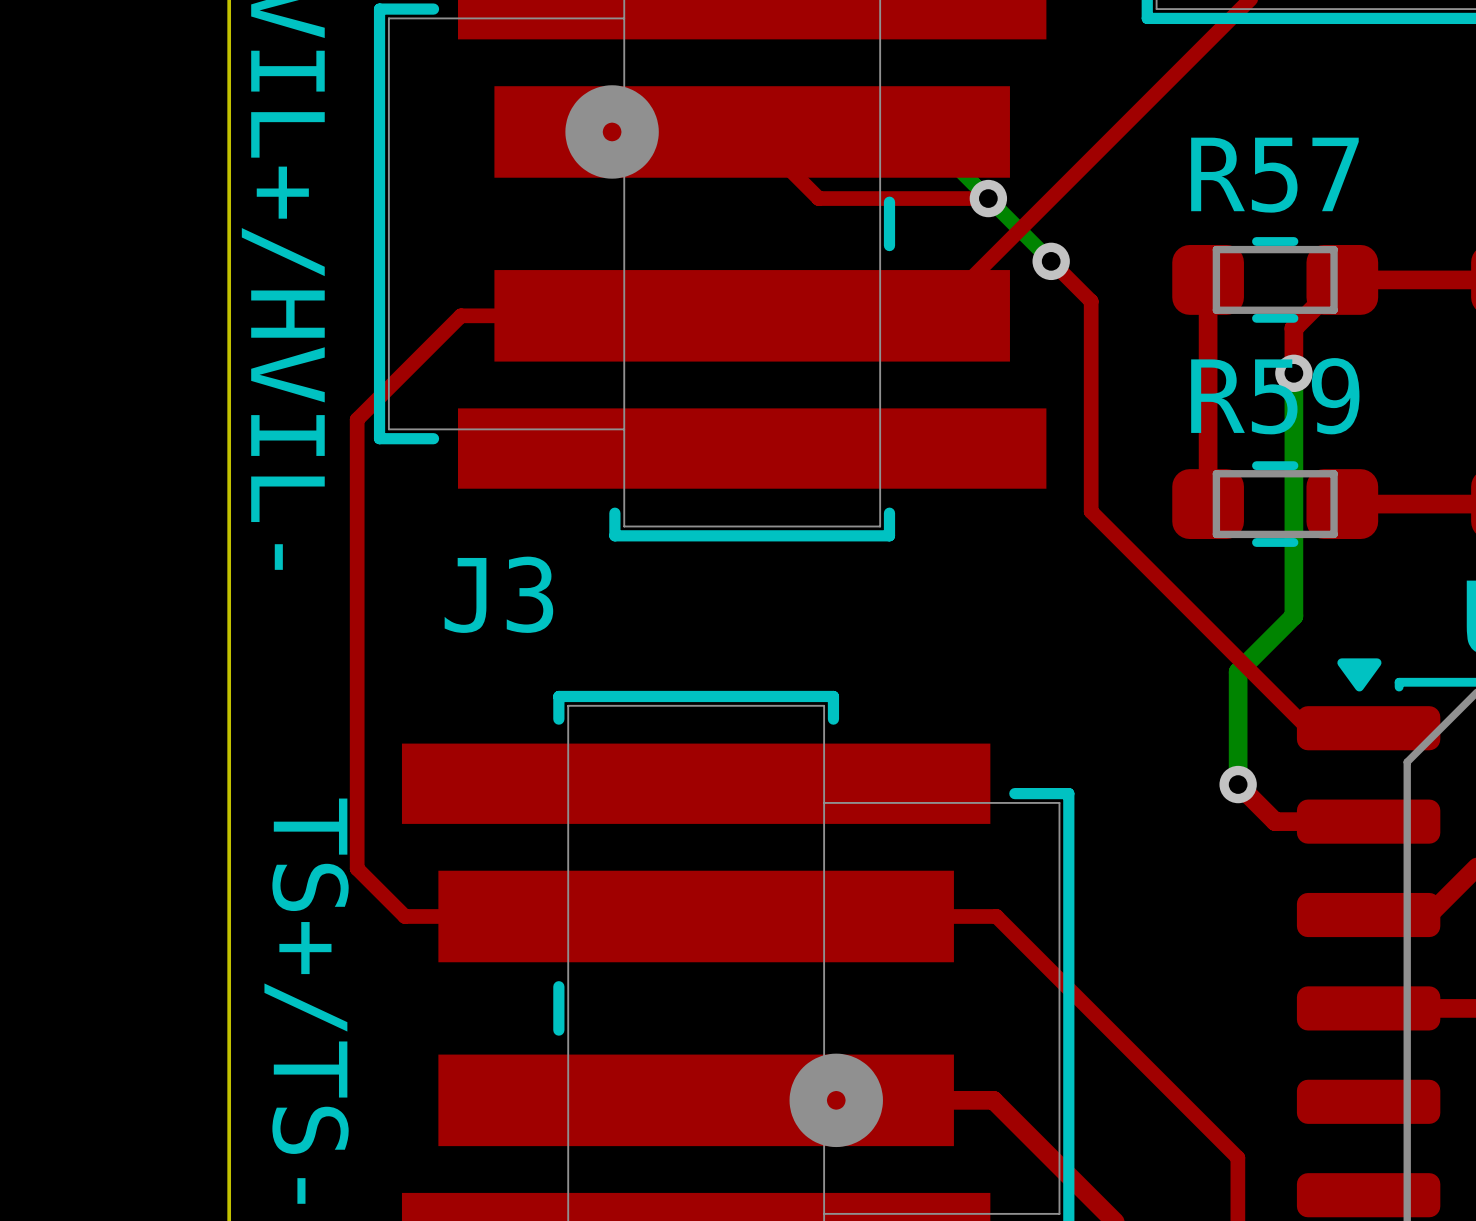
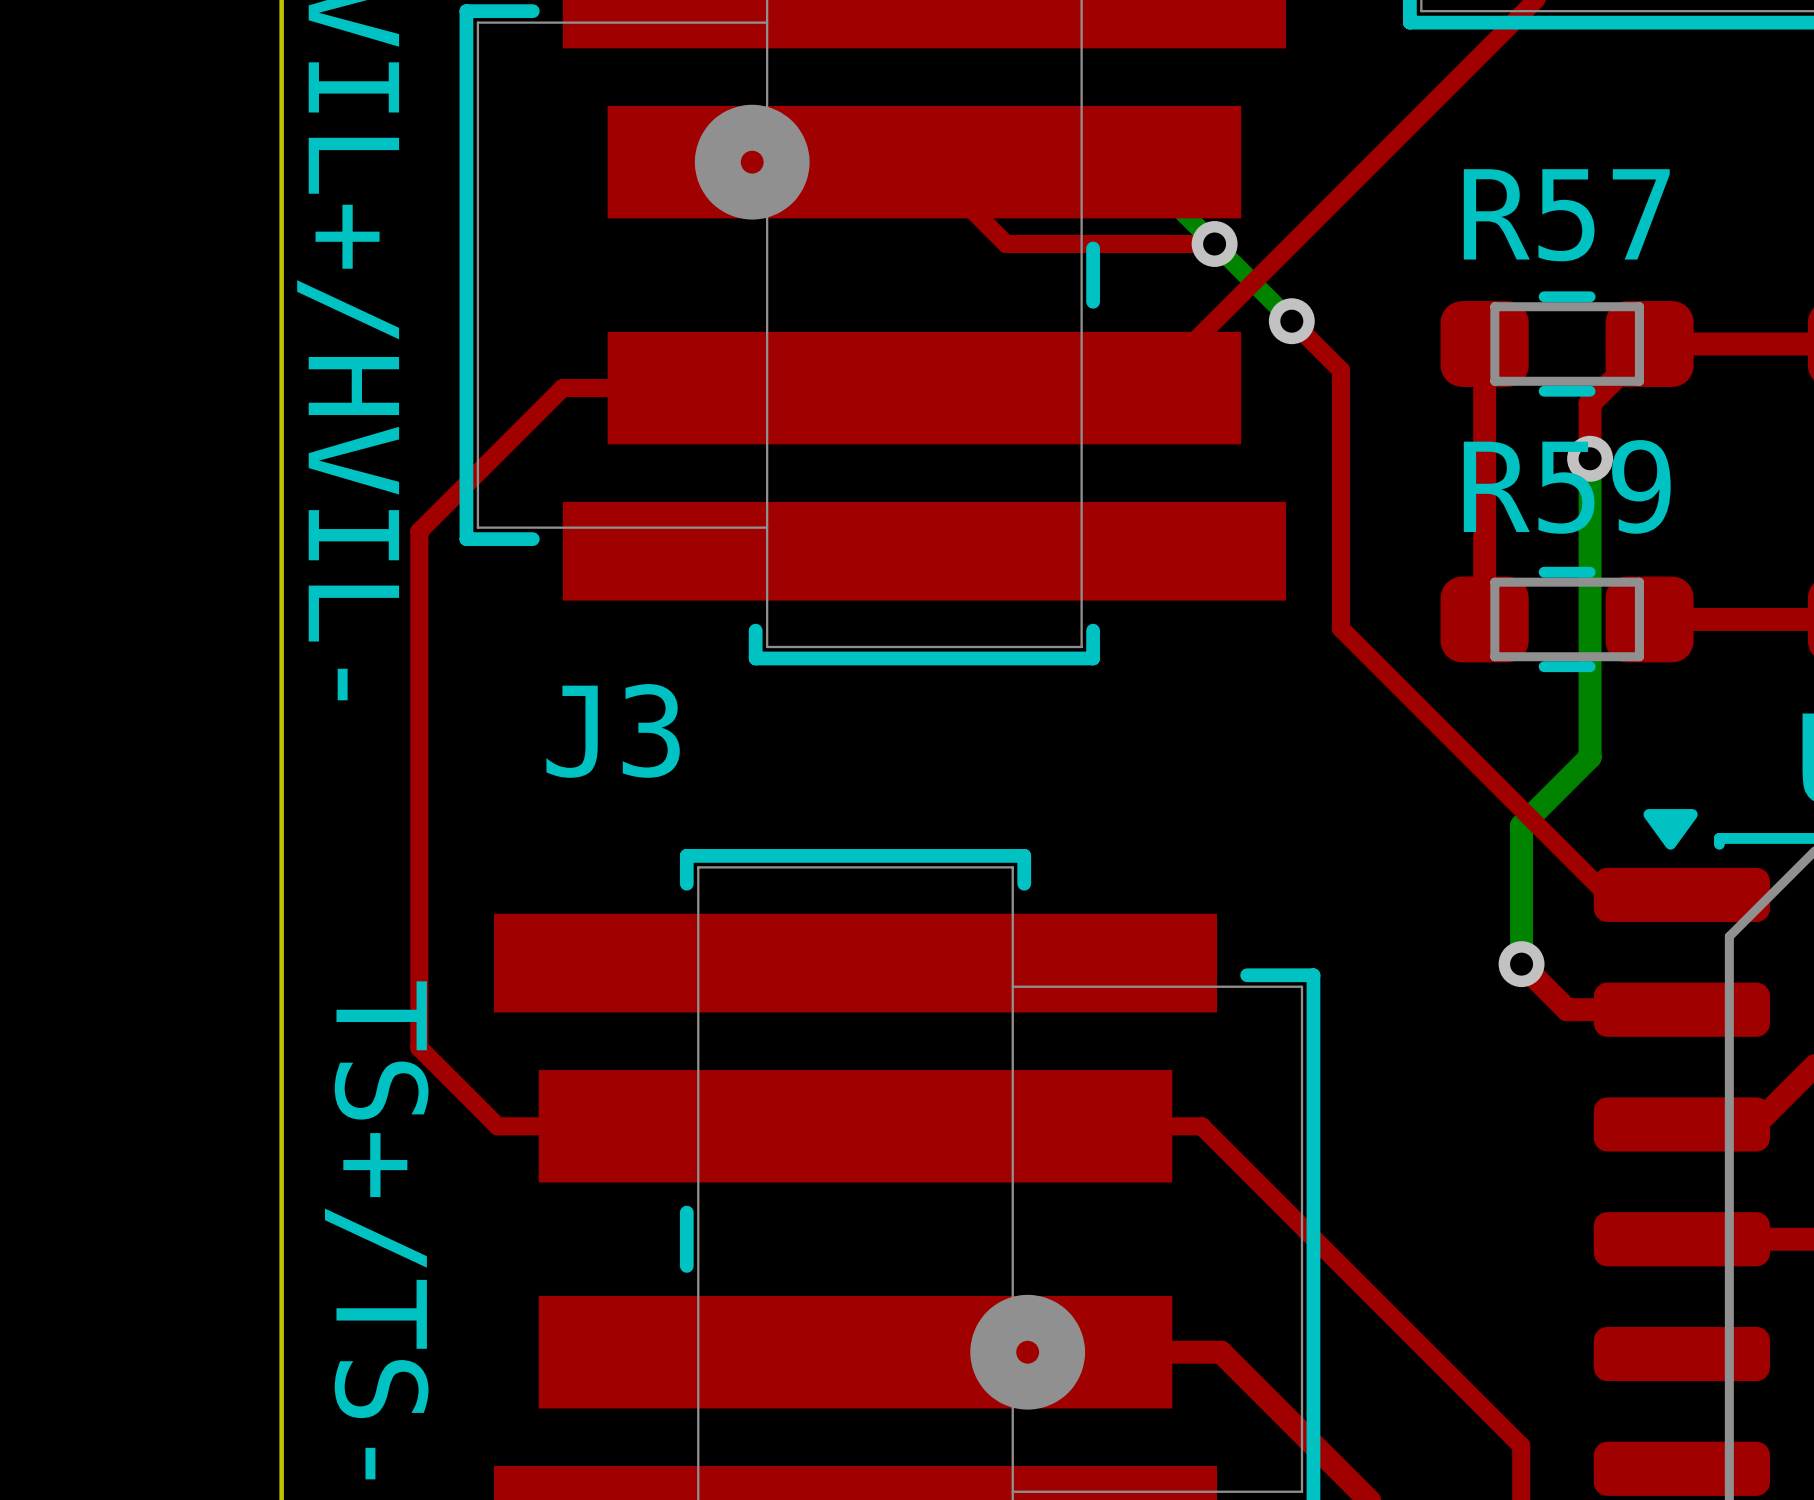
top track: (461, 315) (357, 419) (357, 868) -> (566, 388) (562, 388) (419, 531) (419, 1047) (438, 1067)
top track: (977, 916) (996, 916) (1237, 1157) (1237, 1176) -> (1201, 1126) (1521, 1445)

